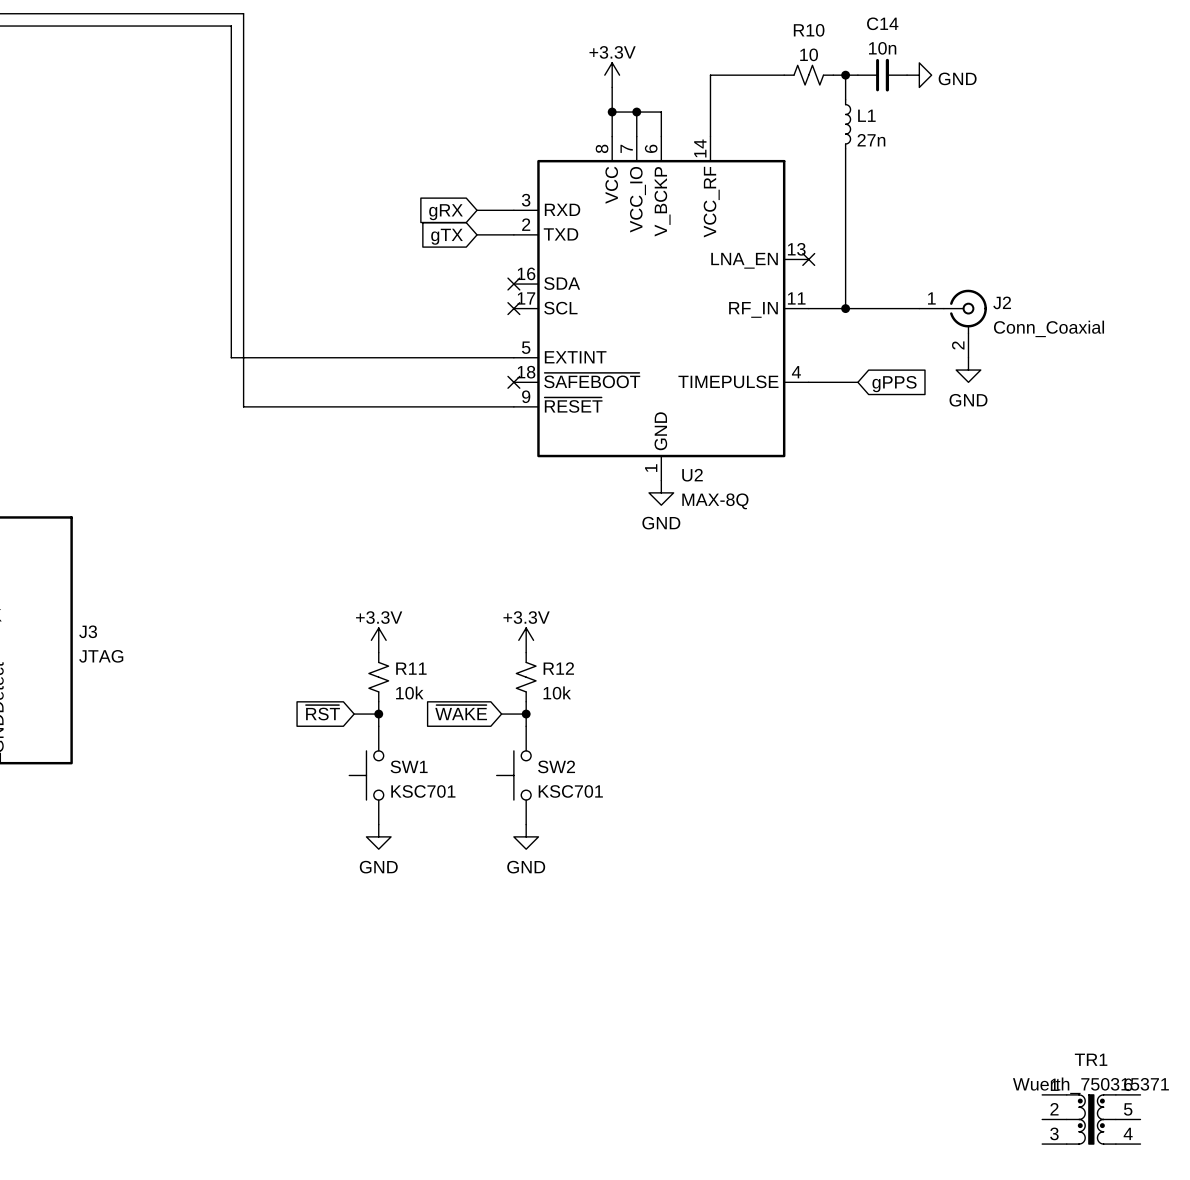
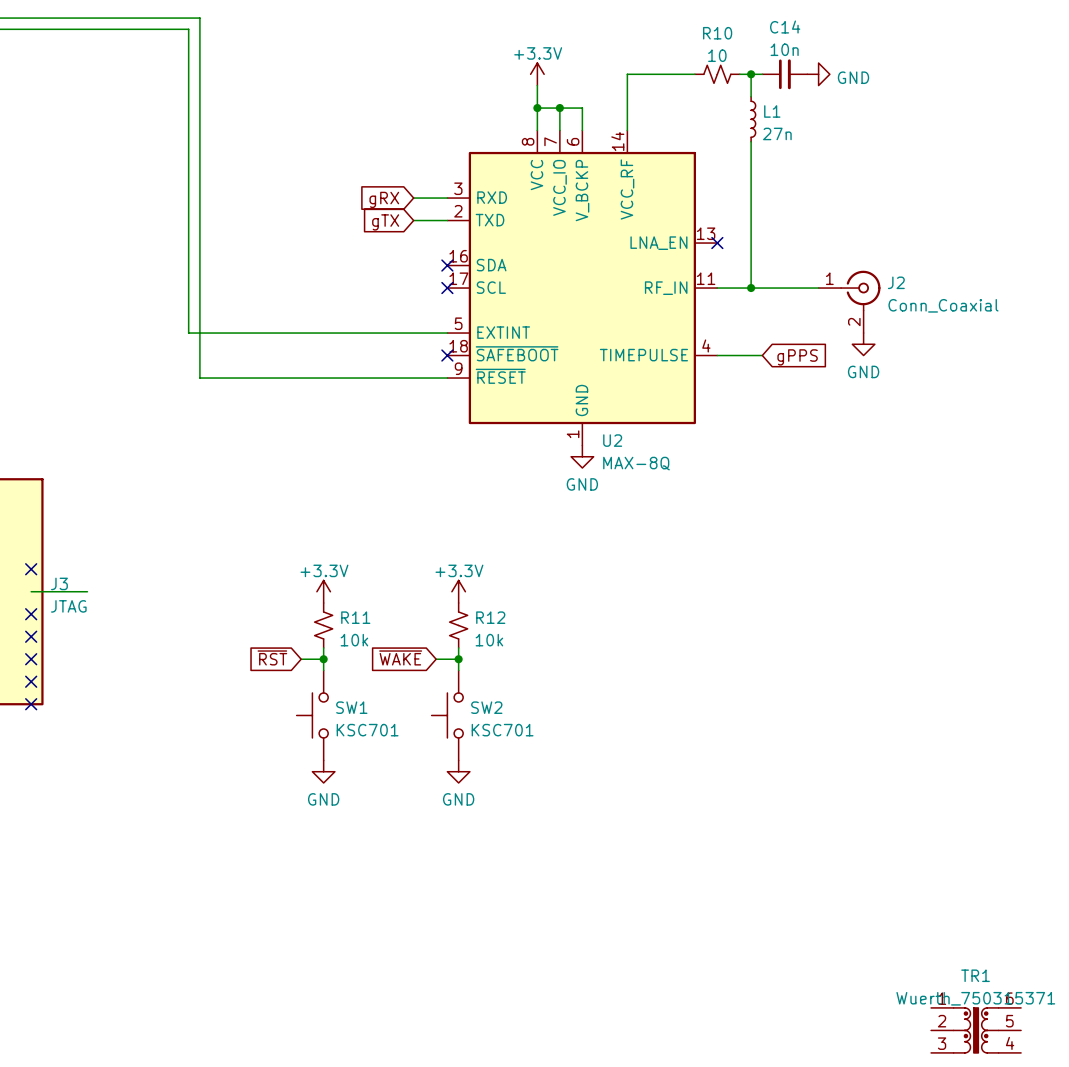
no-connect mark: none -> (31, 569)
wire: none -> (31, 591) (87, 591)
no-connect mark: none -> (31, 614)
no-connect mark: none -> (31, 636)
no-connect mark: none -> (31, 659)
no-connect mark: none -> (31, 681)
no-connect mark: none -> (31, 704)

